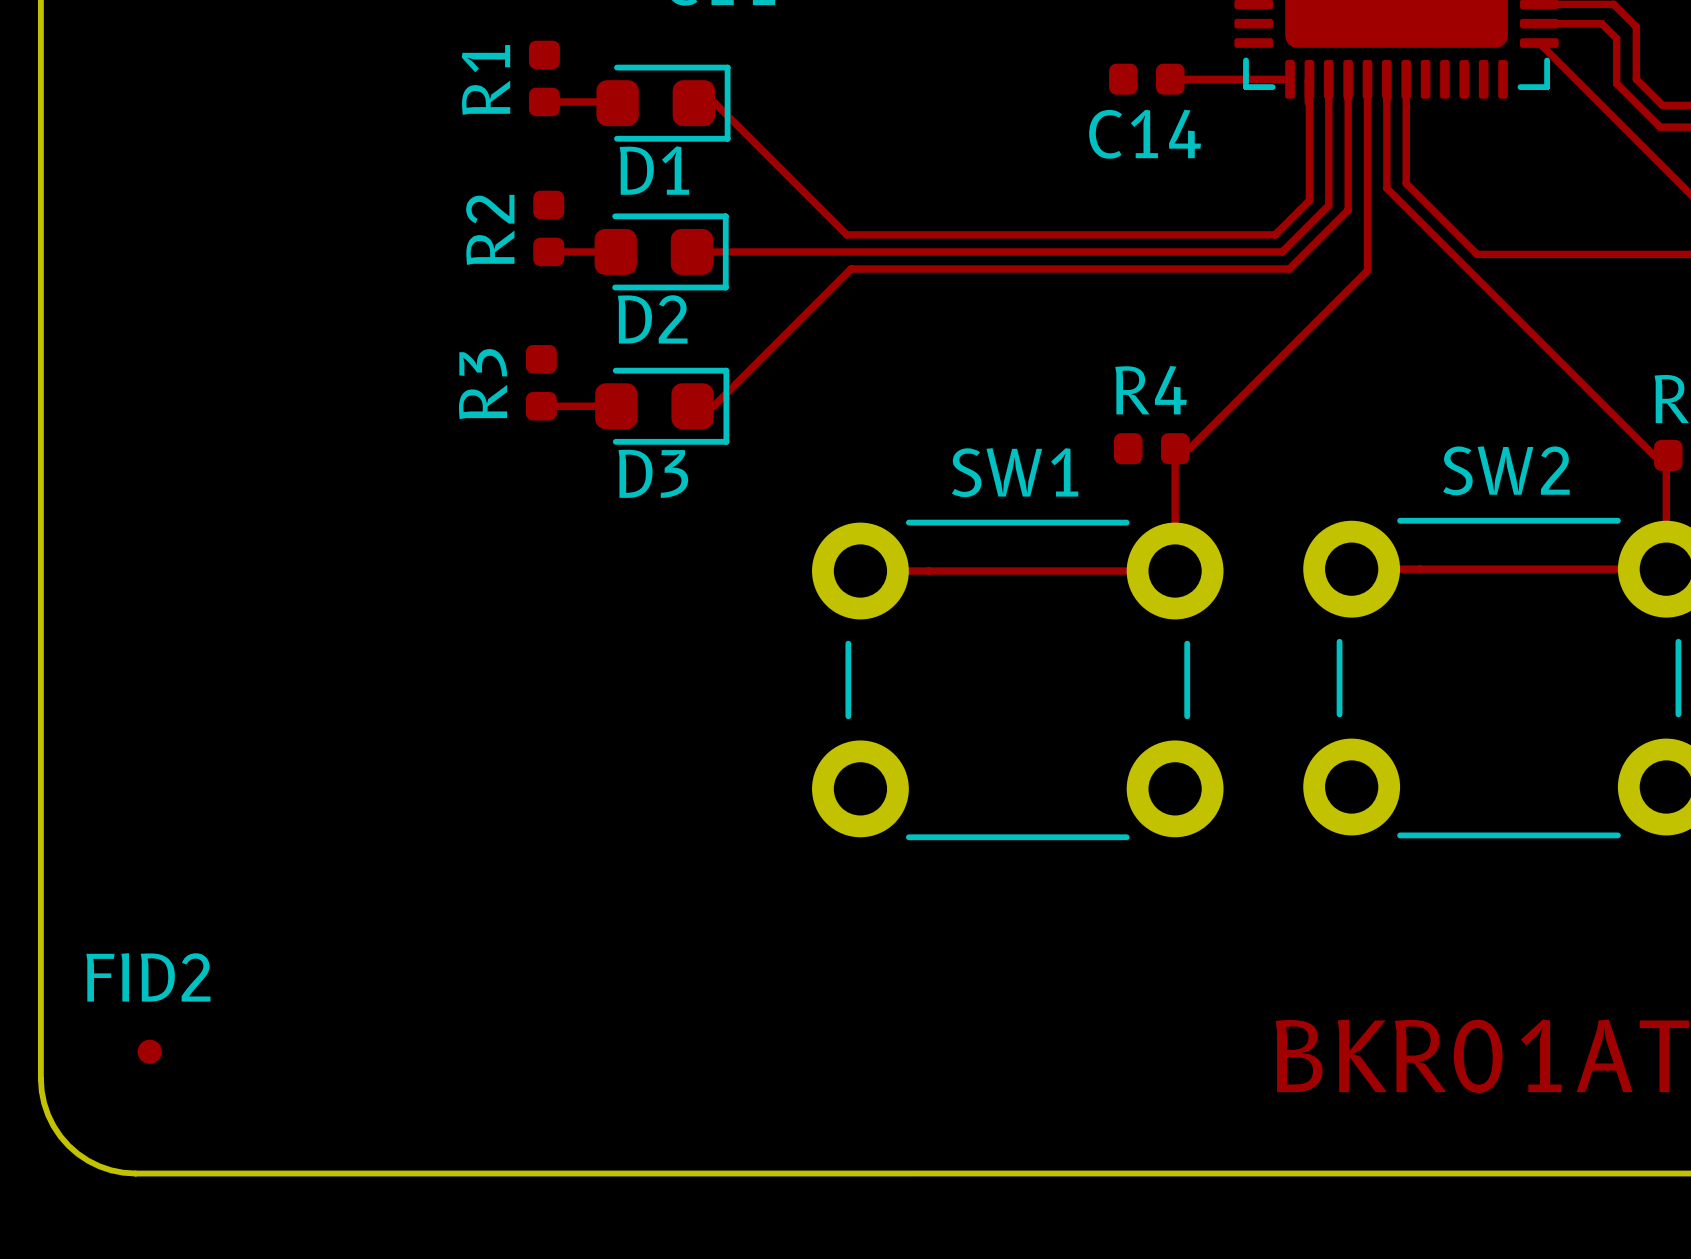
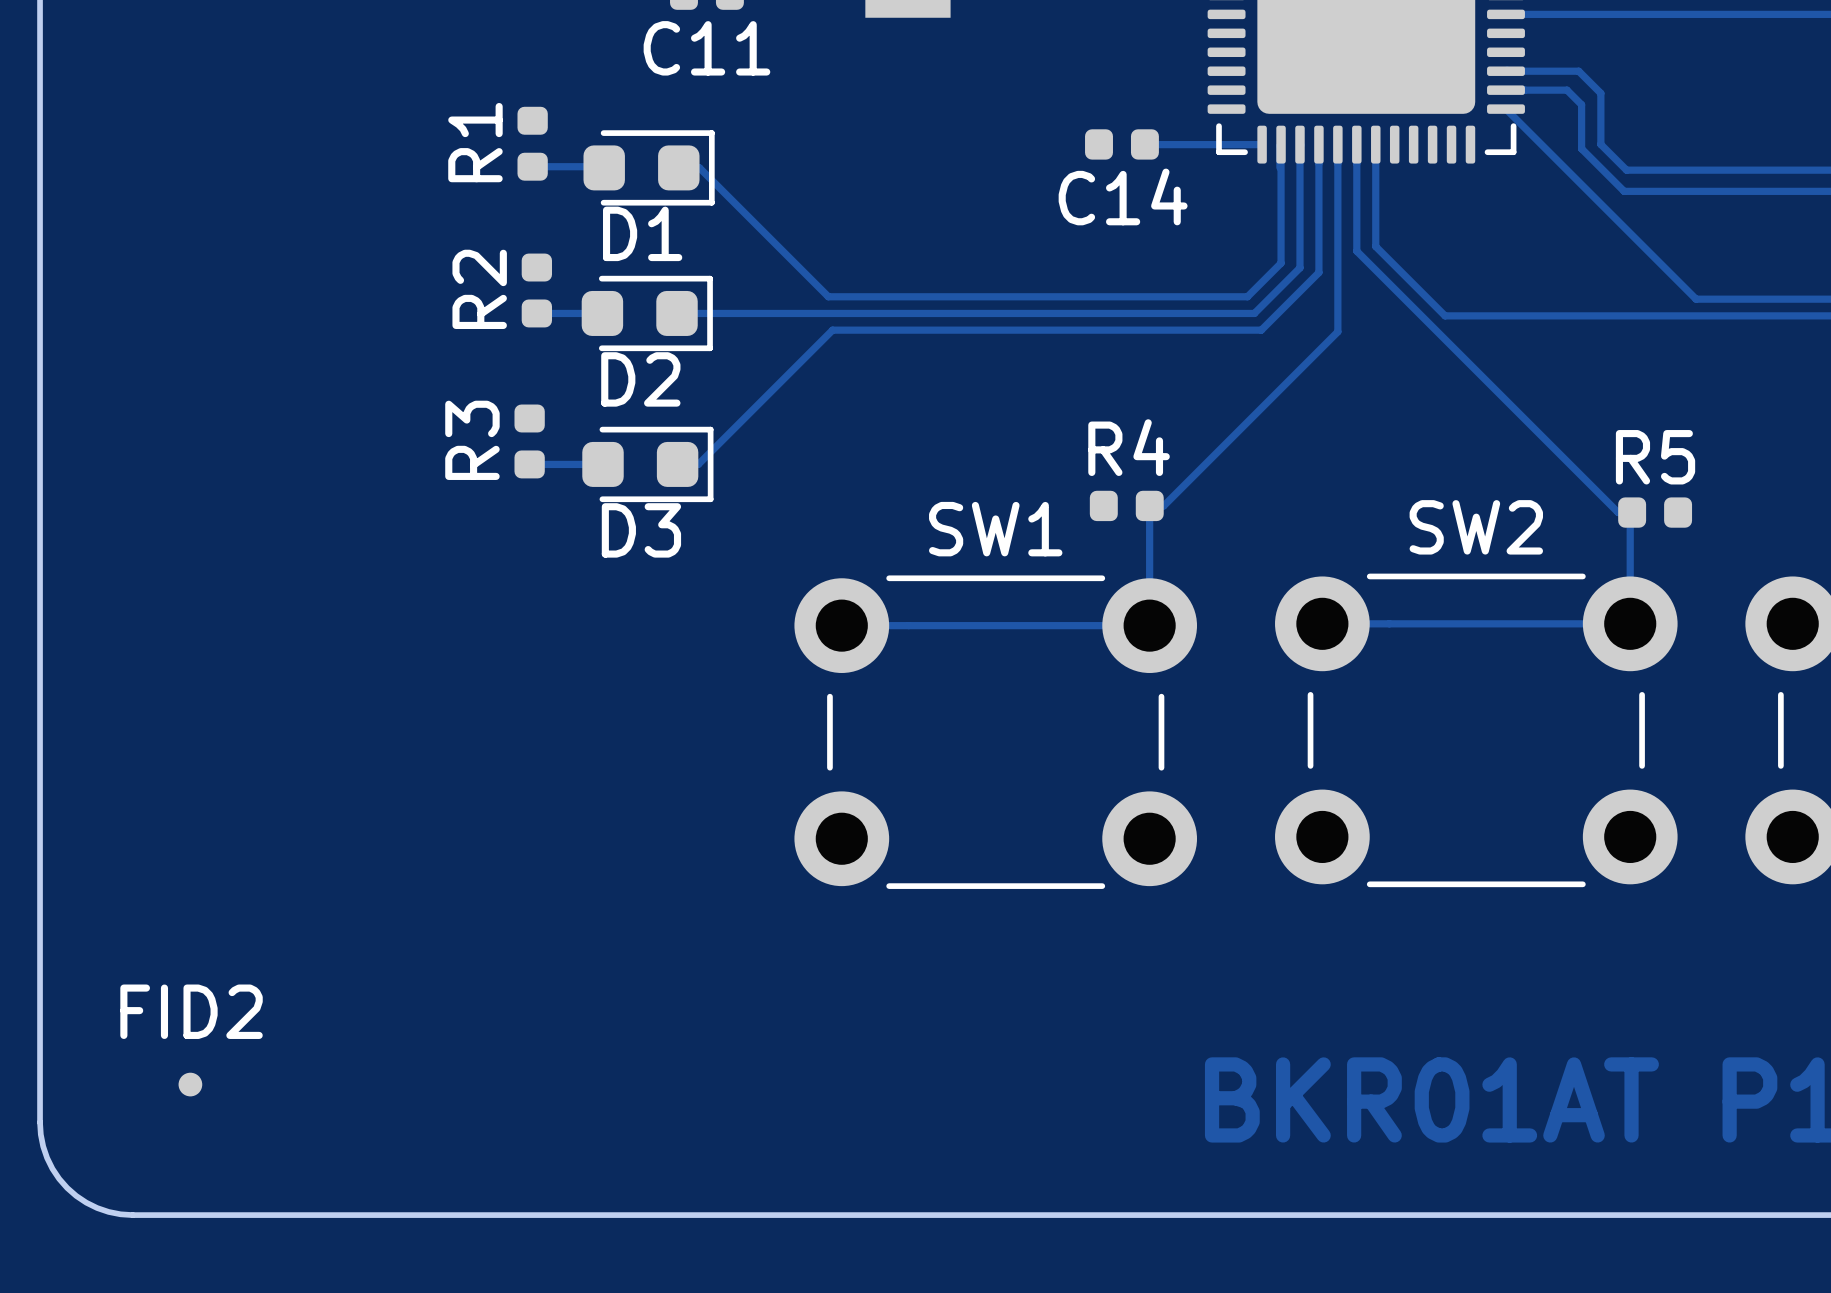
FID2 position: (149, 1051) -> (190, 1084)

